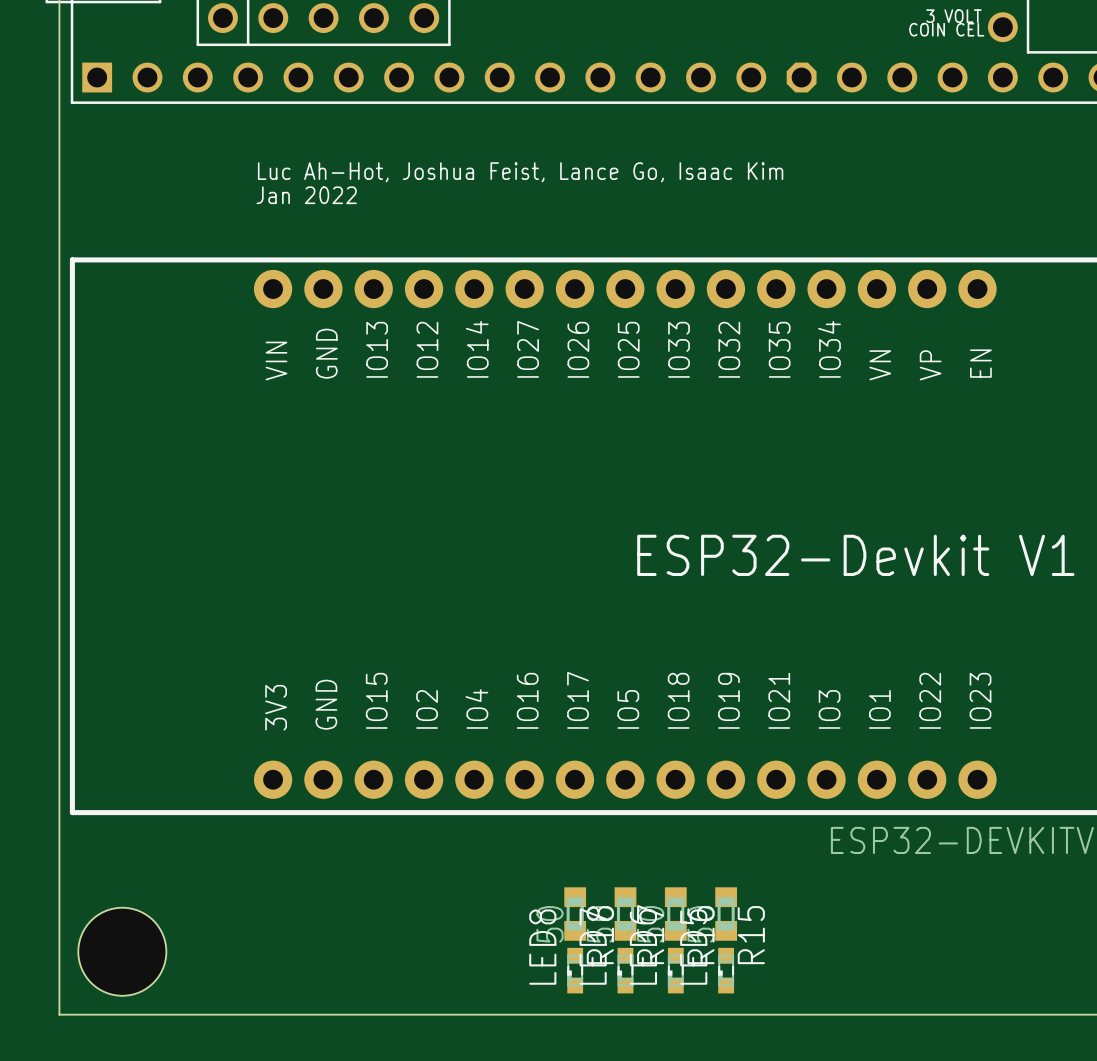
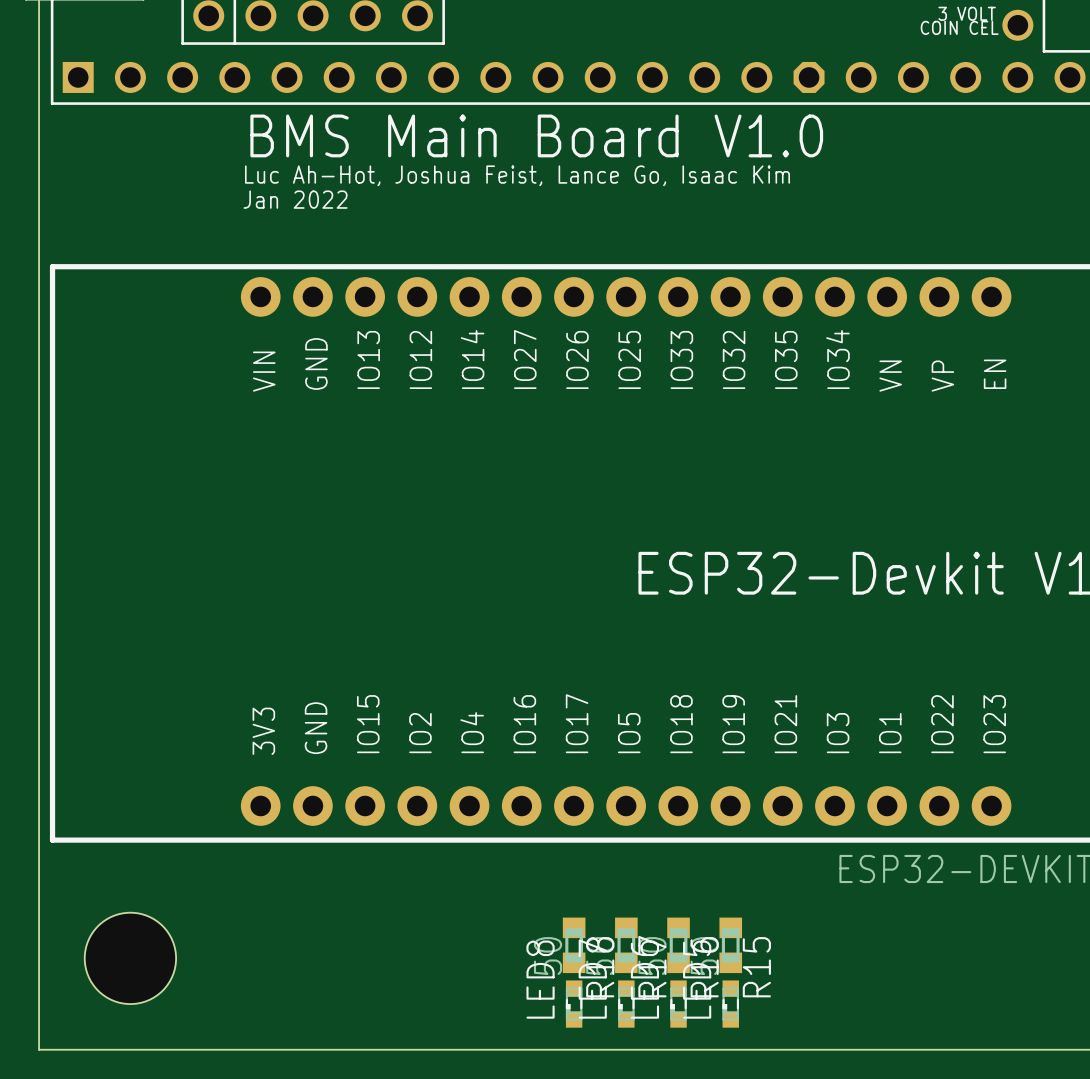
text: none -> BMS Main Board V1.0 (536, 135)
hole position: (122, 951) -> (130, 958)

